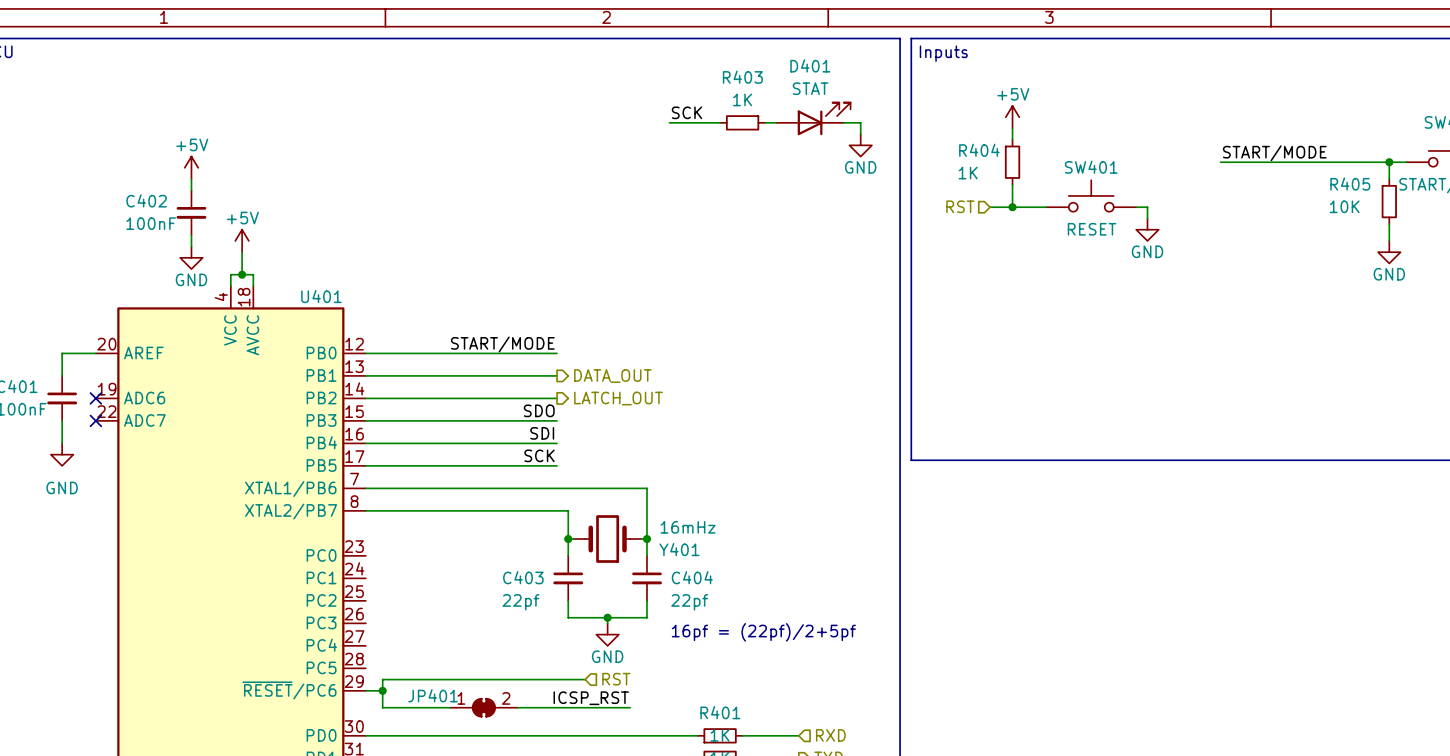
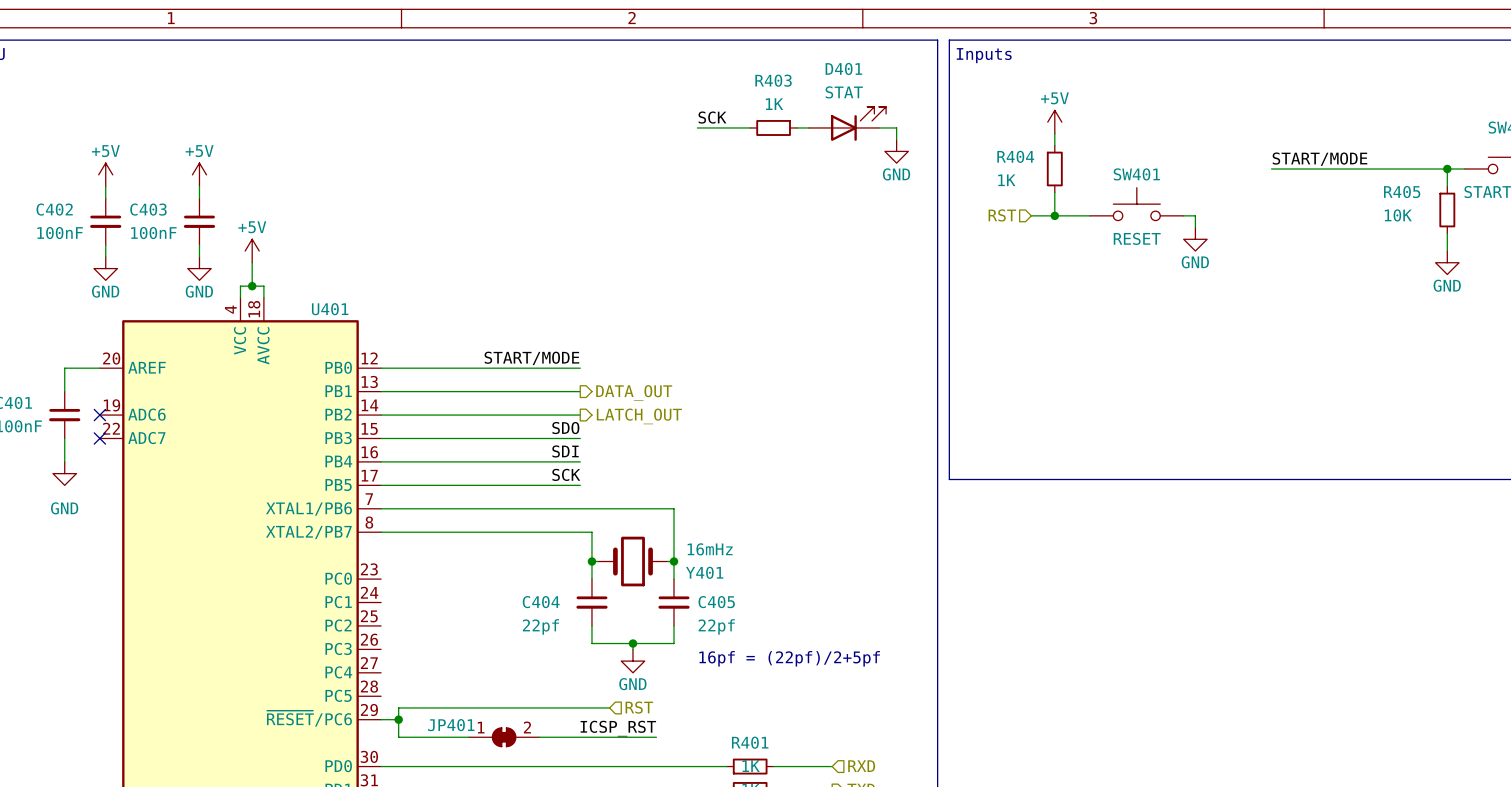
power symbol: none -> +5V (105, 174)
wire: none -> (105, 186) (105, 198)
C402 name: C402 (146, 200) -> C403 (148, 209)
C402: none -> 100nF (105, 221)
wire: none -> (105, 245) (105, 256)
power symbol: none -> GND (105, 268)
C403 name: C403 (523, 577) -> C404 (541, 602)
C404 name: C404 (692, 577) -> C405 (716, 602)

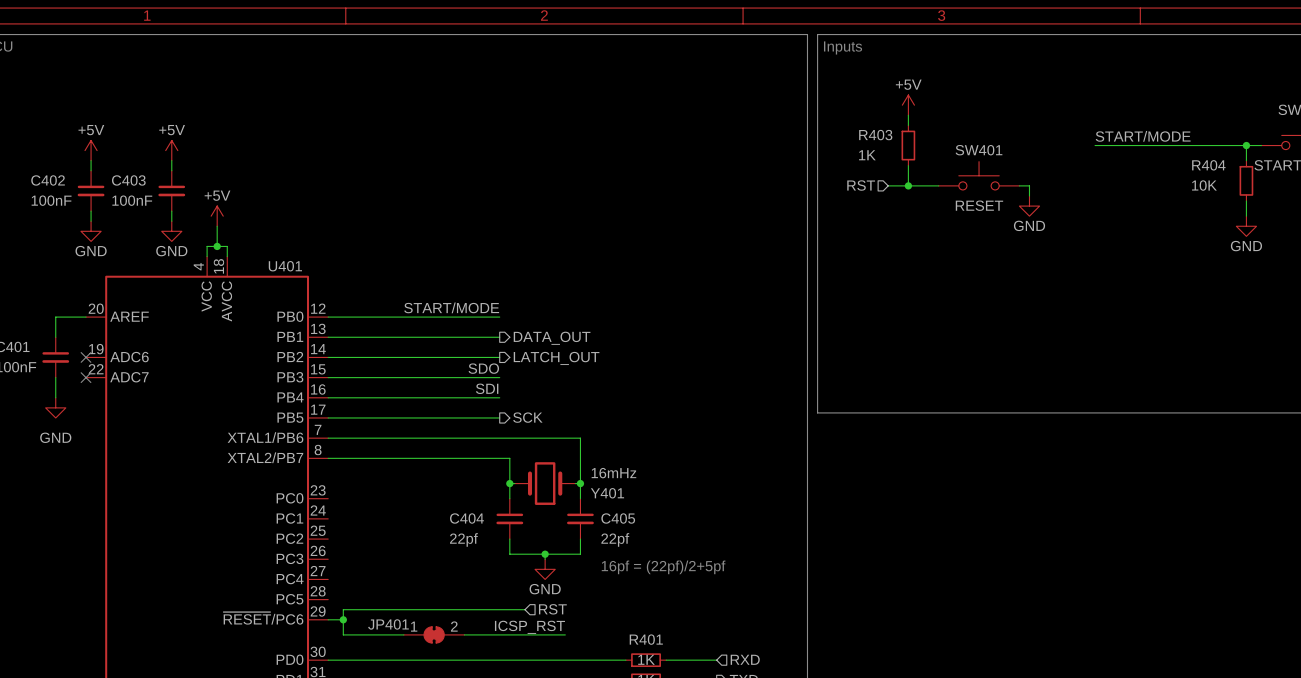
label: SCK (712, 117) -> none
D401: STAT (847, 123) -> none
wire: (697, 127) (750, 127) -> none
R403: 1K (773, 127) -> none
wire: (797, 127) (808, 127) -> none
wire: (879, 127) (896, 127) (896, 139) -> none
power symbol: GND (896, 151) -> none
R404 name: R404 (1015, 156) -> R403 (875, 135)
R405 name: R405 (1402, 192) -> R404 (1208, 165)
label: SCK (566, 474) -> none
hierarchical label: none -> SCK (527, 417)

